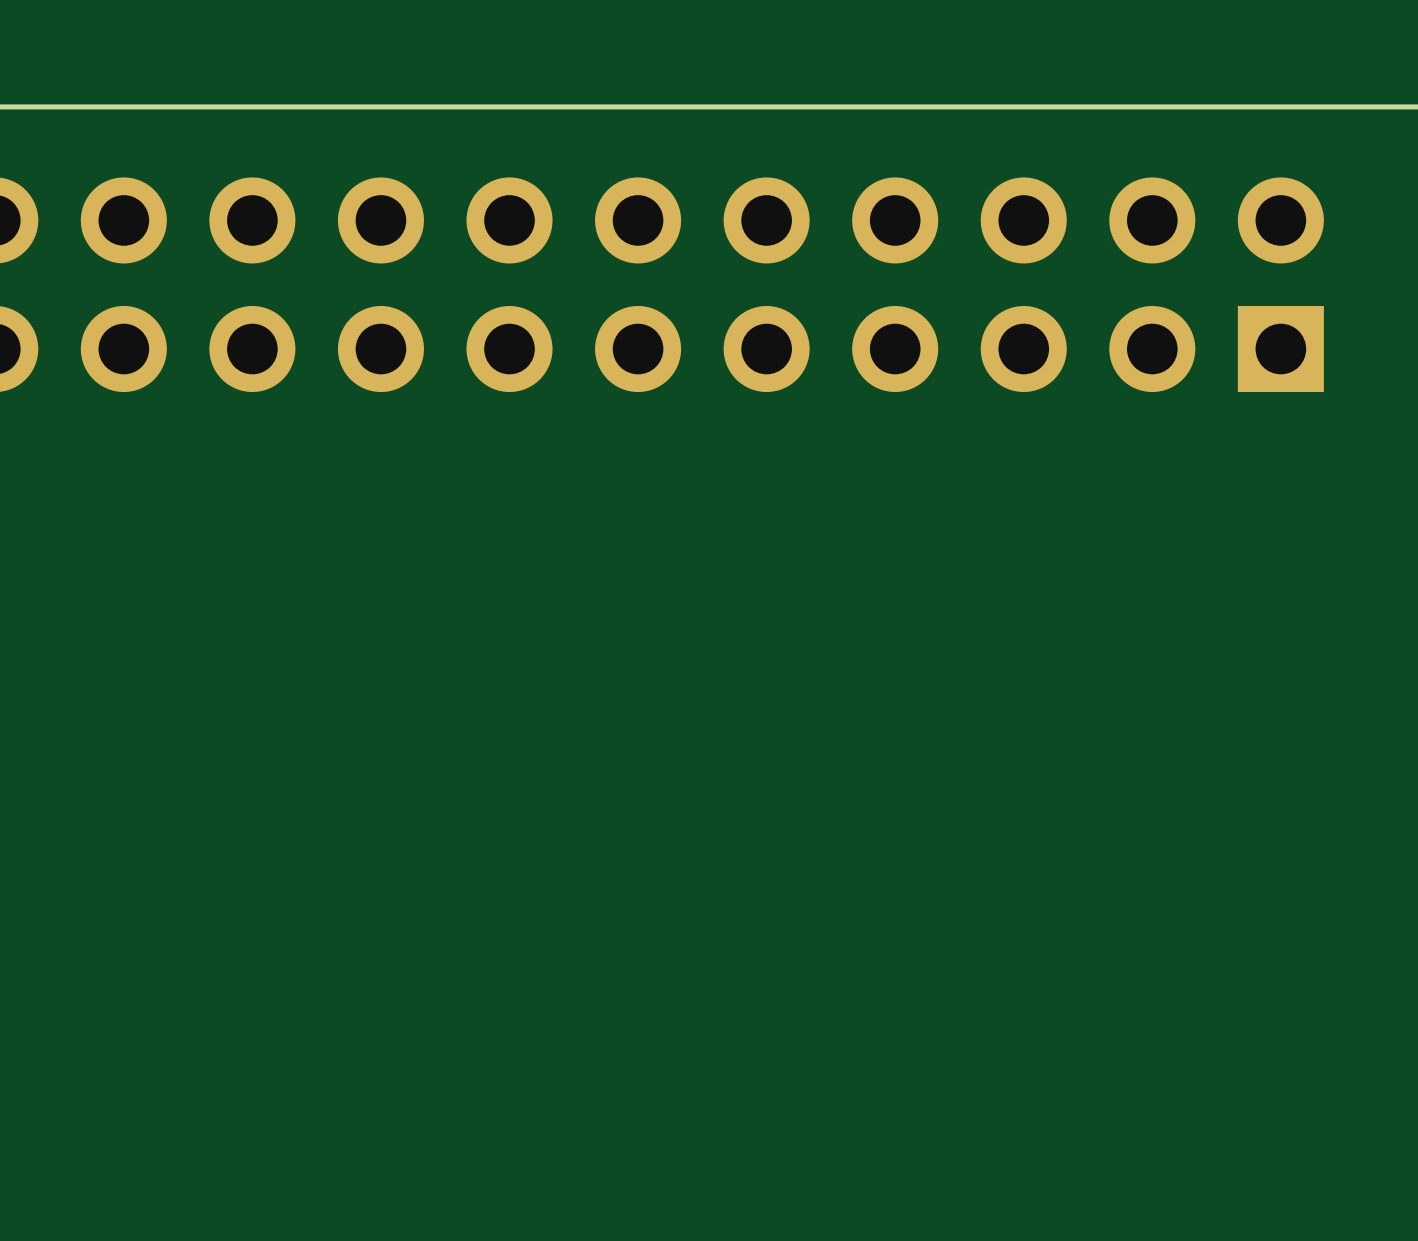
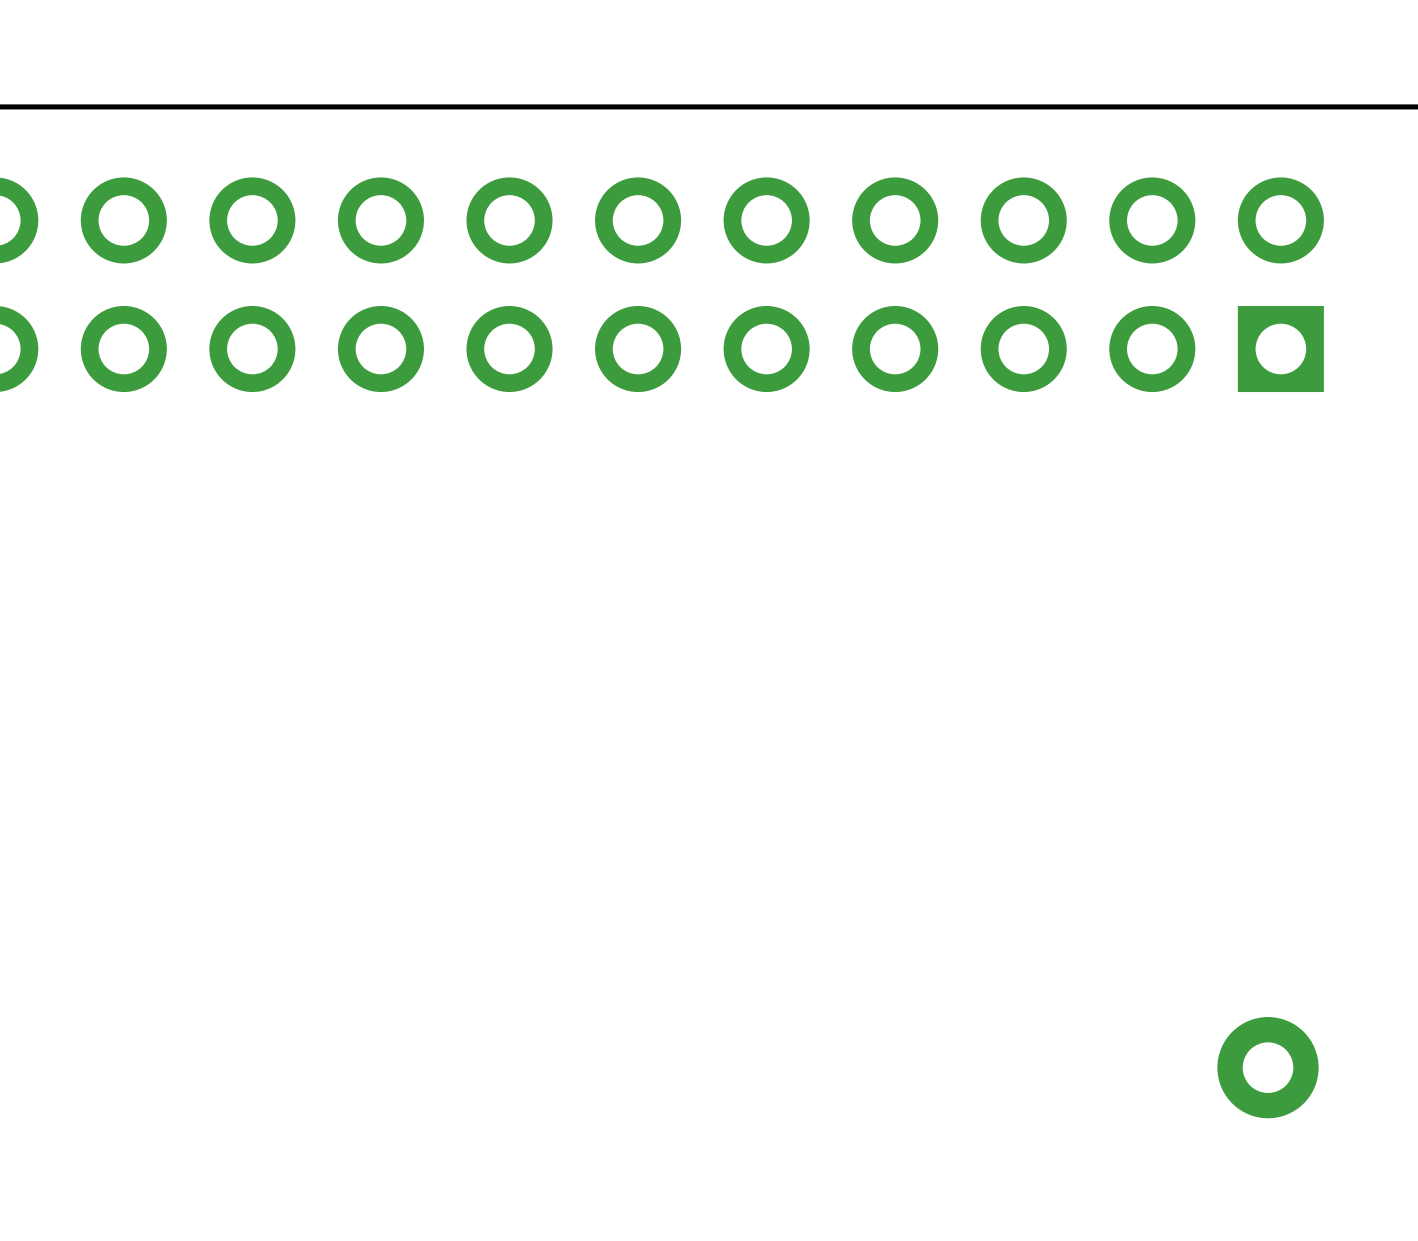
part: none -> (1268, 1067)

